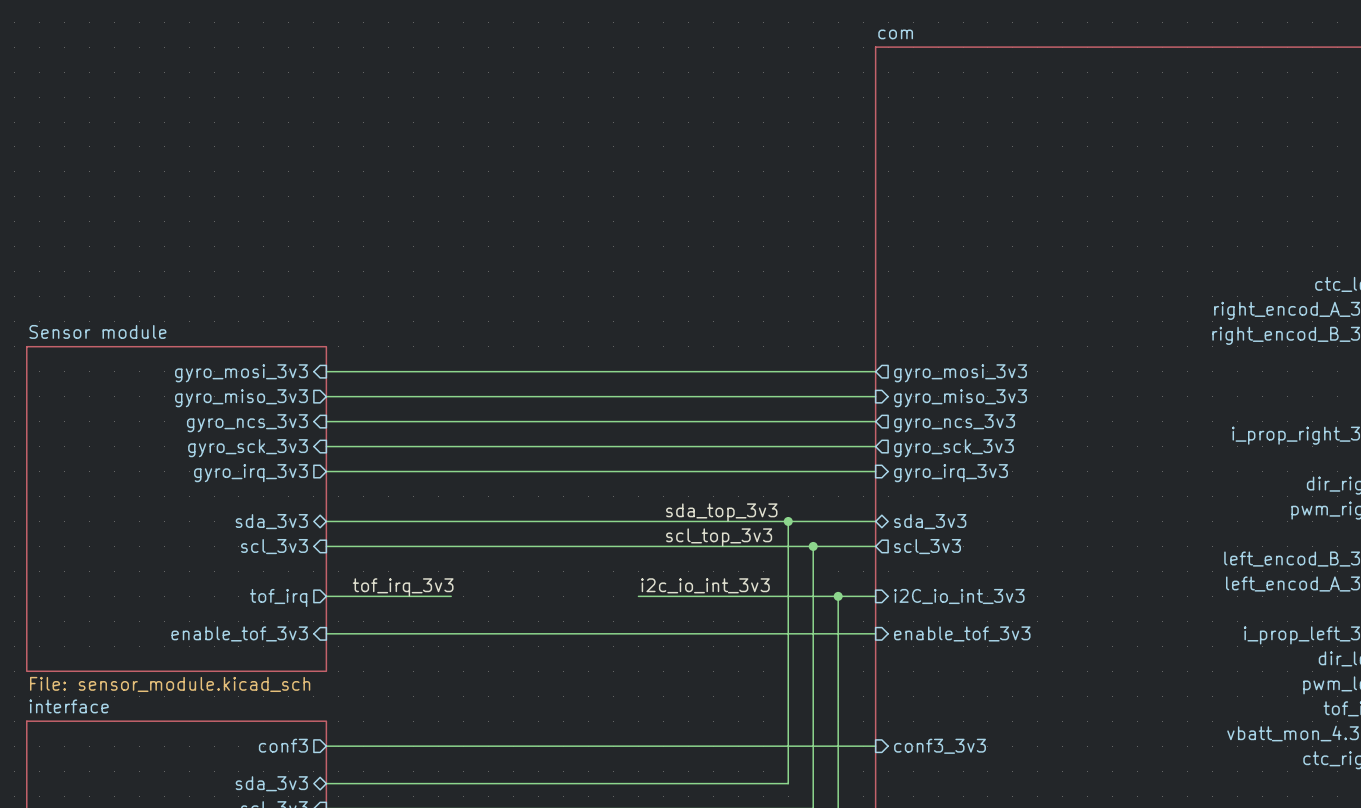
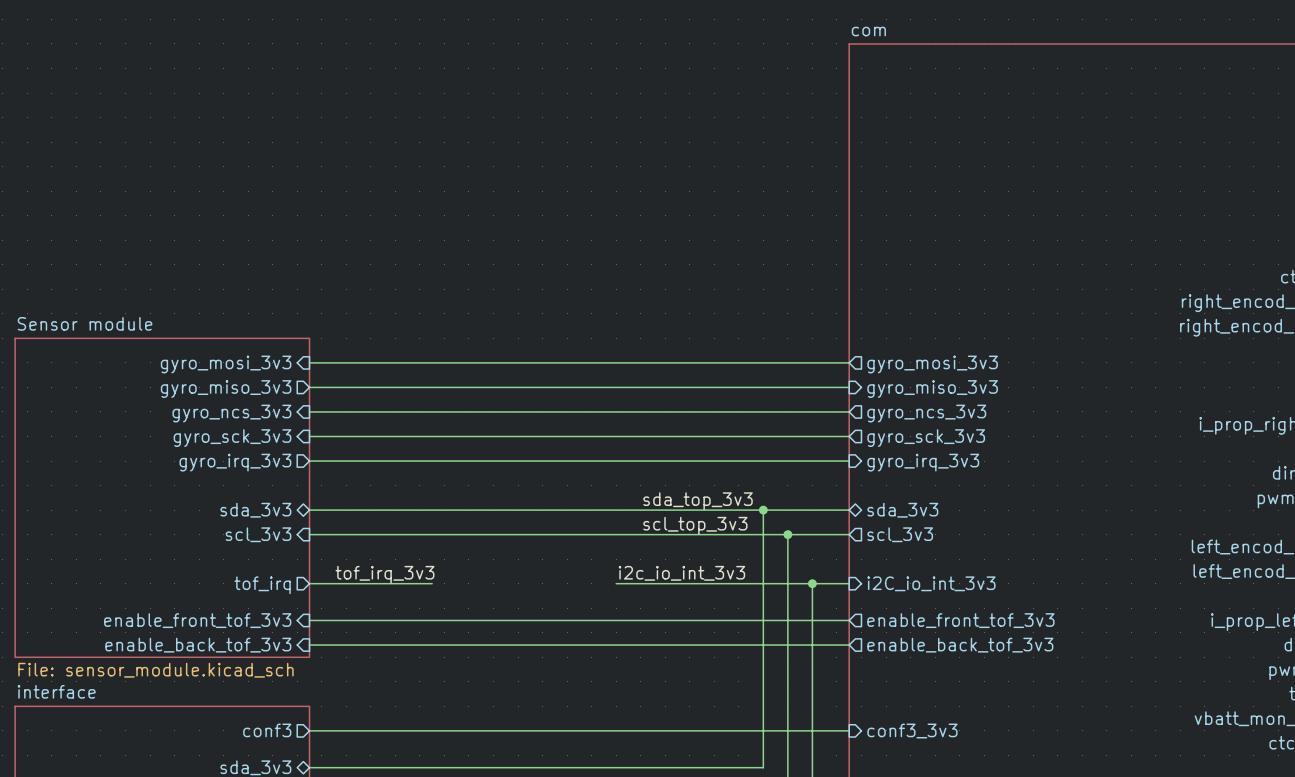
sheet pin: enable_tof_3v3 (239, 633) -> enable_front_tof_3v3 (197, 620)
sheet pin shape: input (962, 633) -> output (960, 620)
sheet pin: enable_tof_3v3 (962, 633) -> enable_front_tof_3v3 (960, 620)
sheet pin: none -> enable_back_tof_3v3 (198, 645)
wire: none -> (309, 645) (849, 645)
sheet pin: none -> enable_back_tof_3v3 (960, 645)

